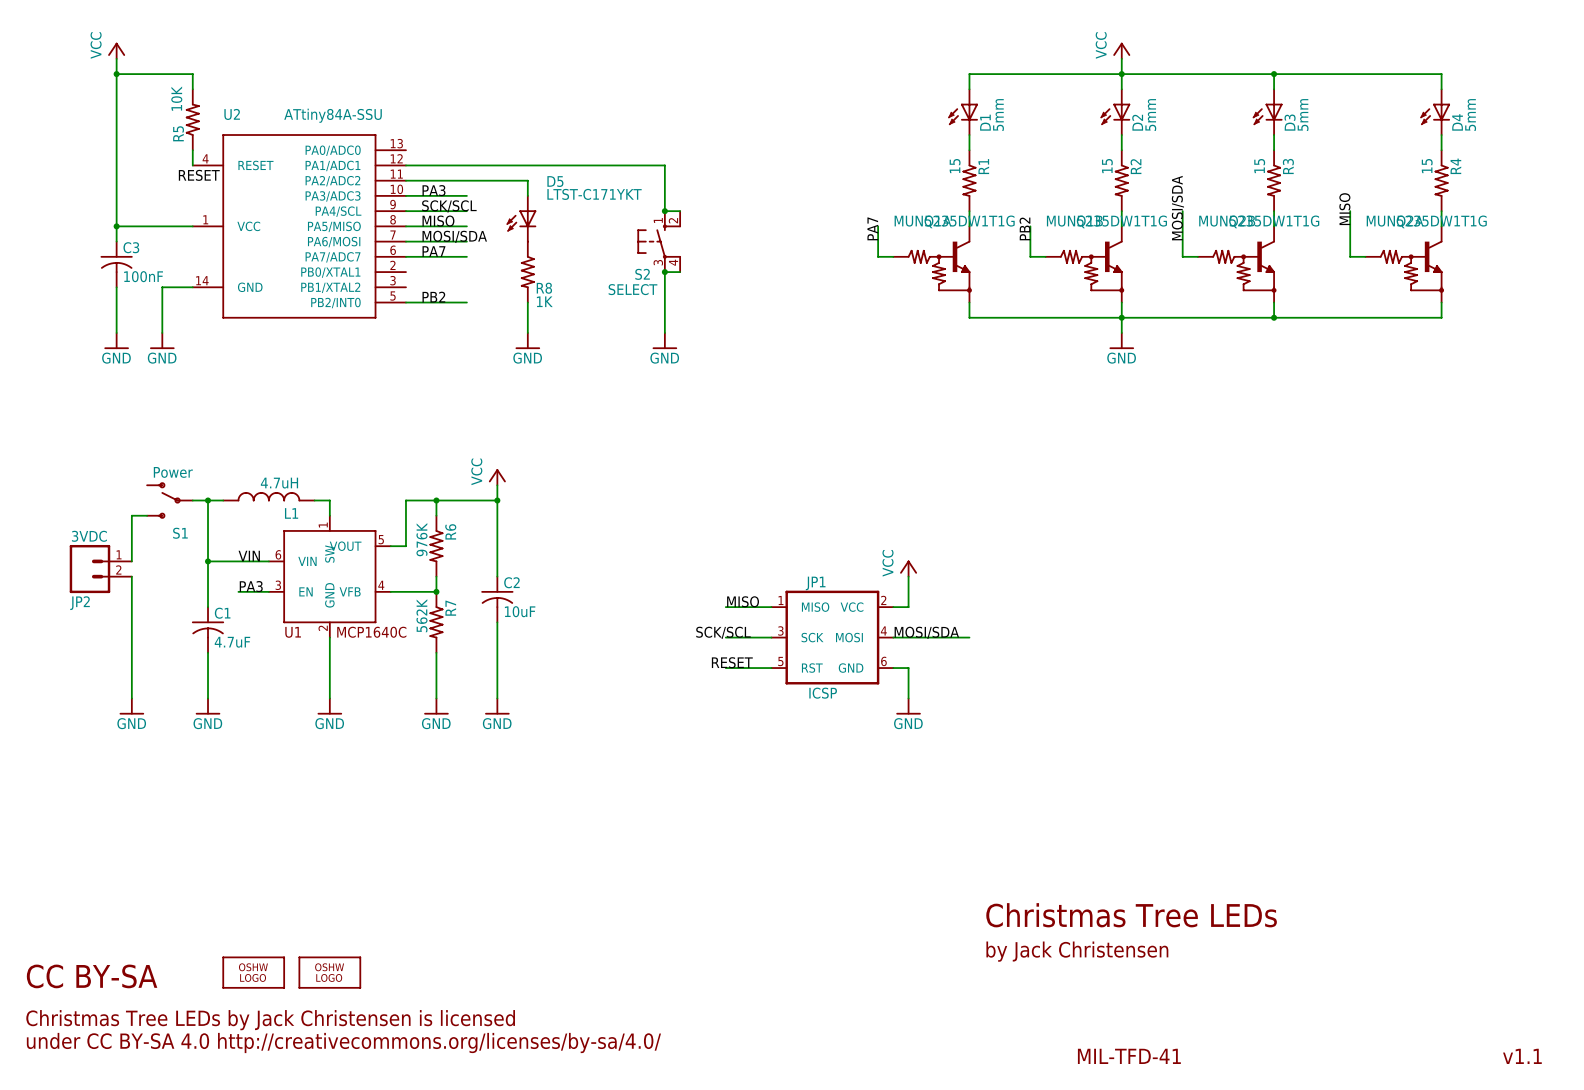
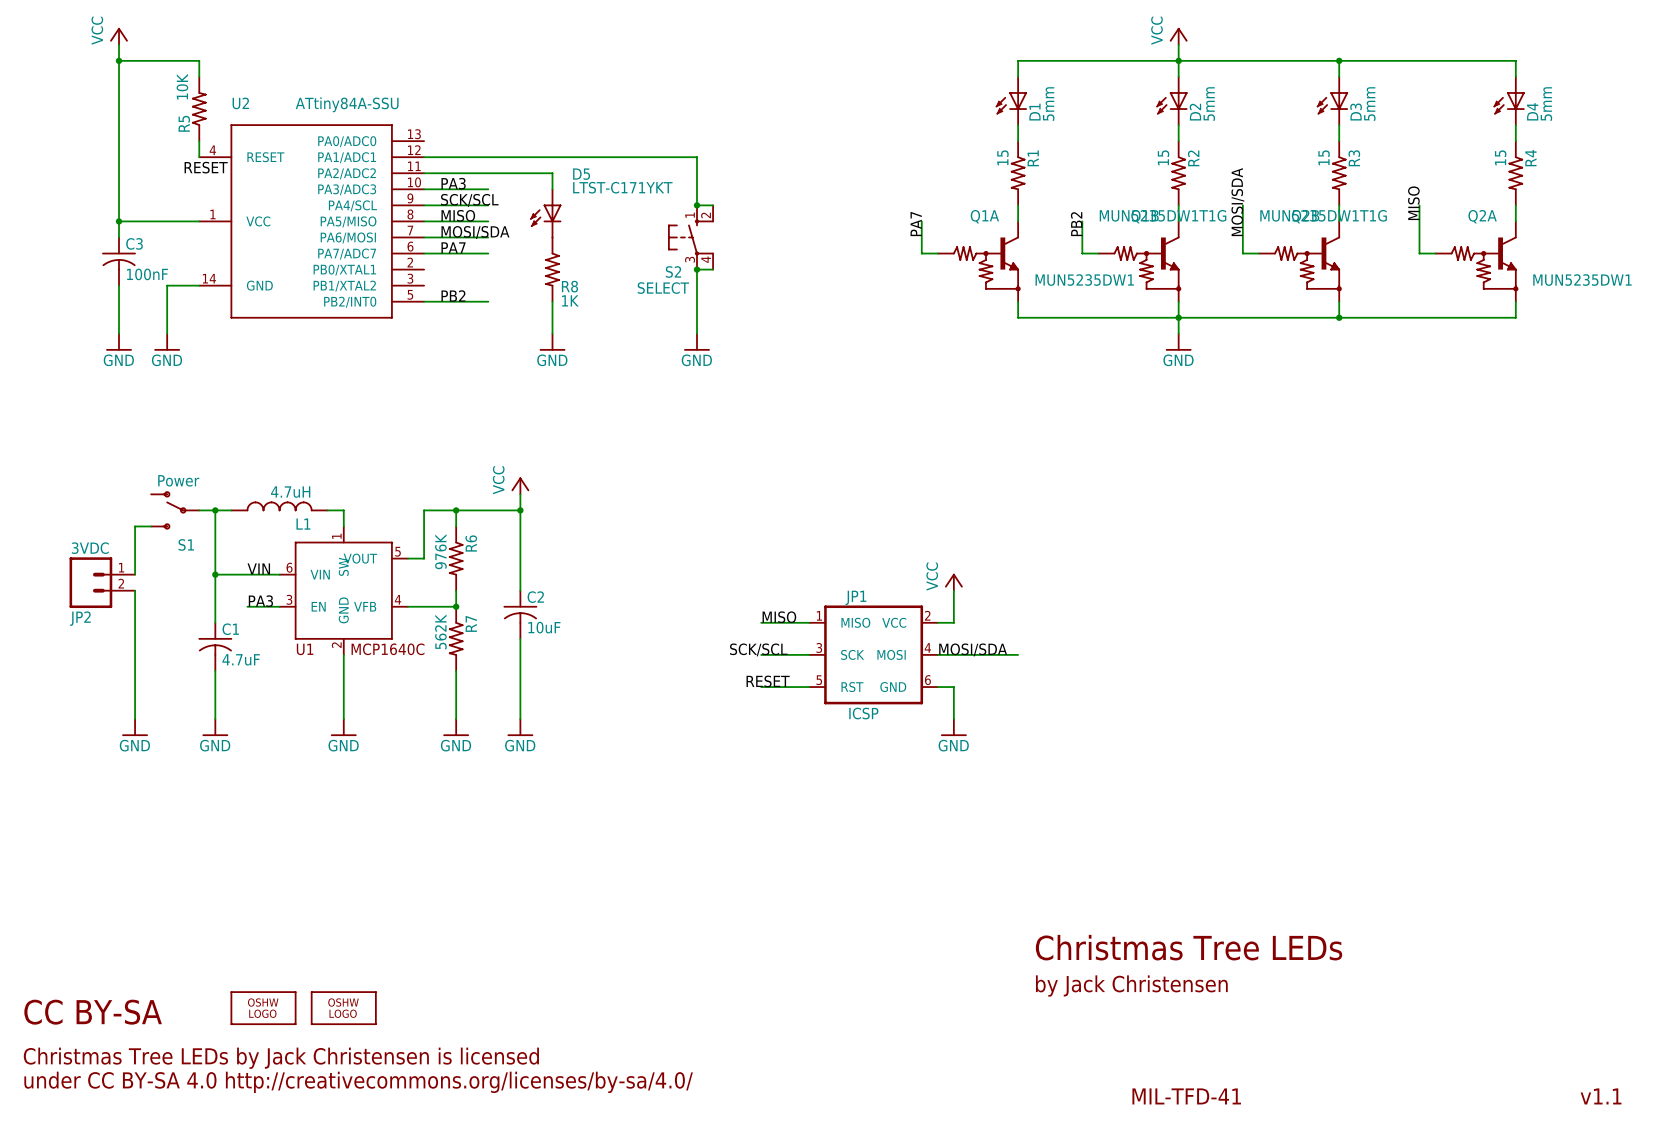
Q1A value: MUN5235DW1T1G (954, 221) -> MUN5235DW1 (1084, 280)
Q2A value: MUN5235DW1T1G (1426, 221) -> MUN5235DW1 (1582, 280)

